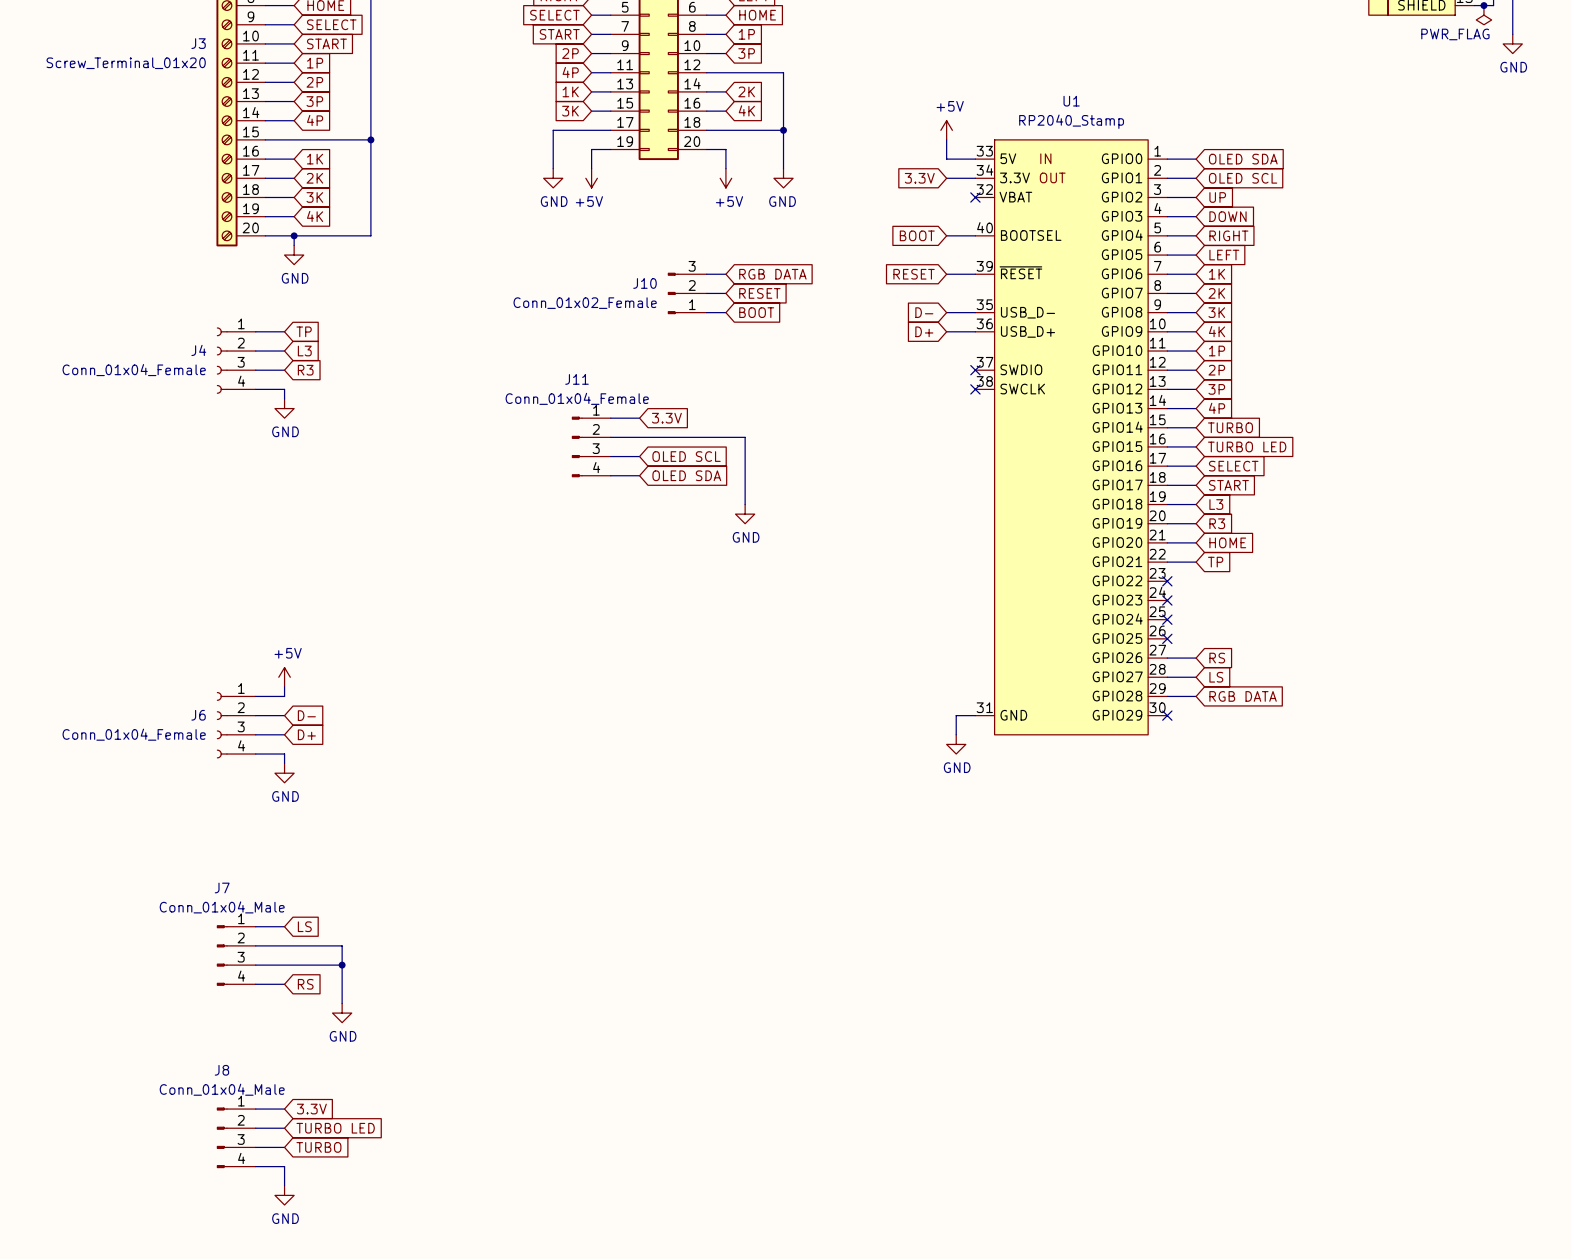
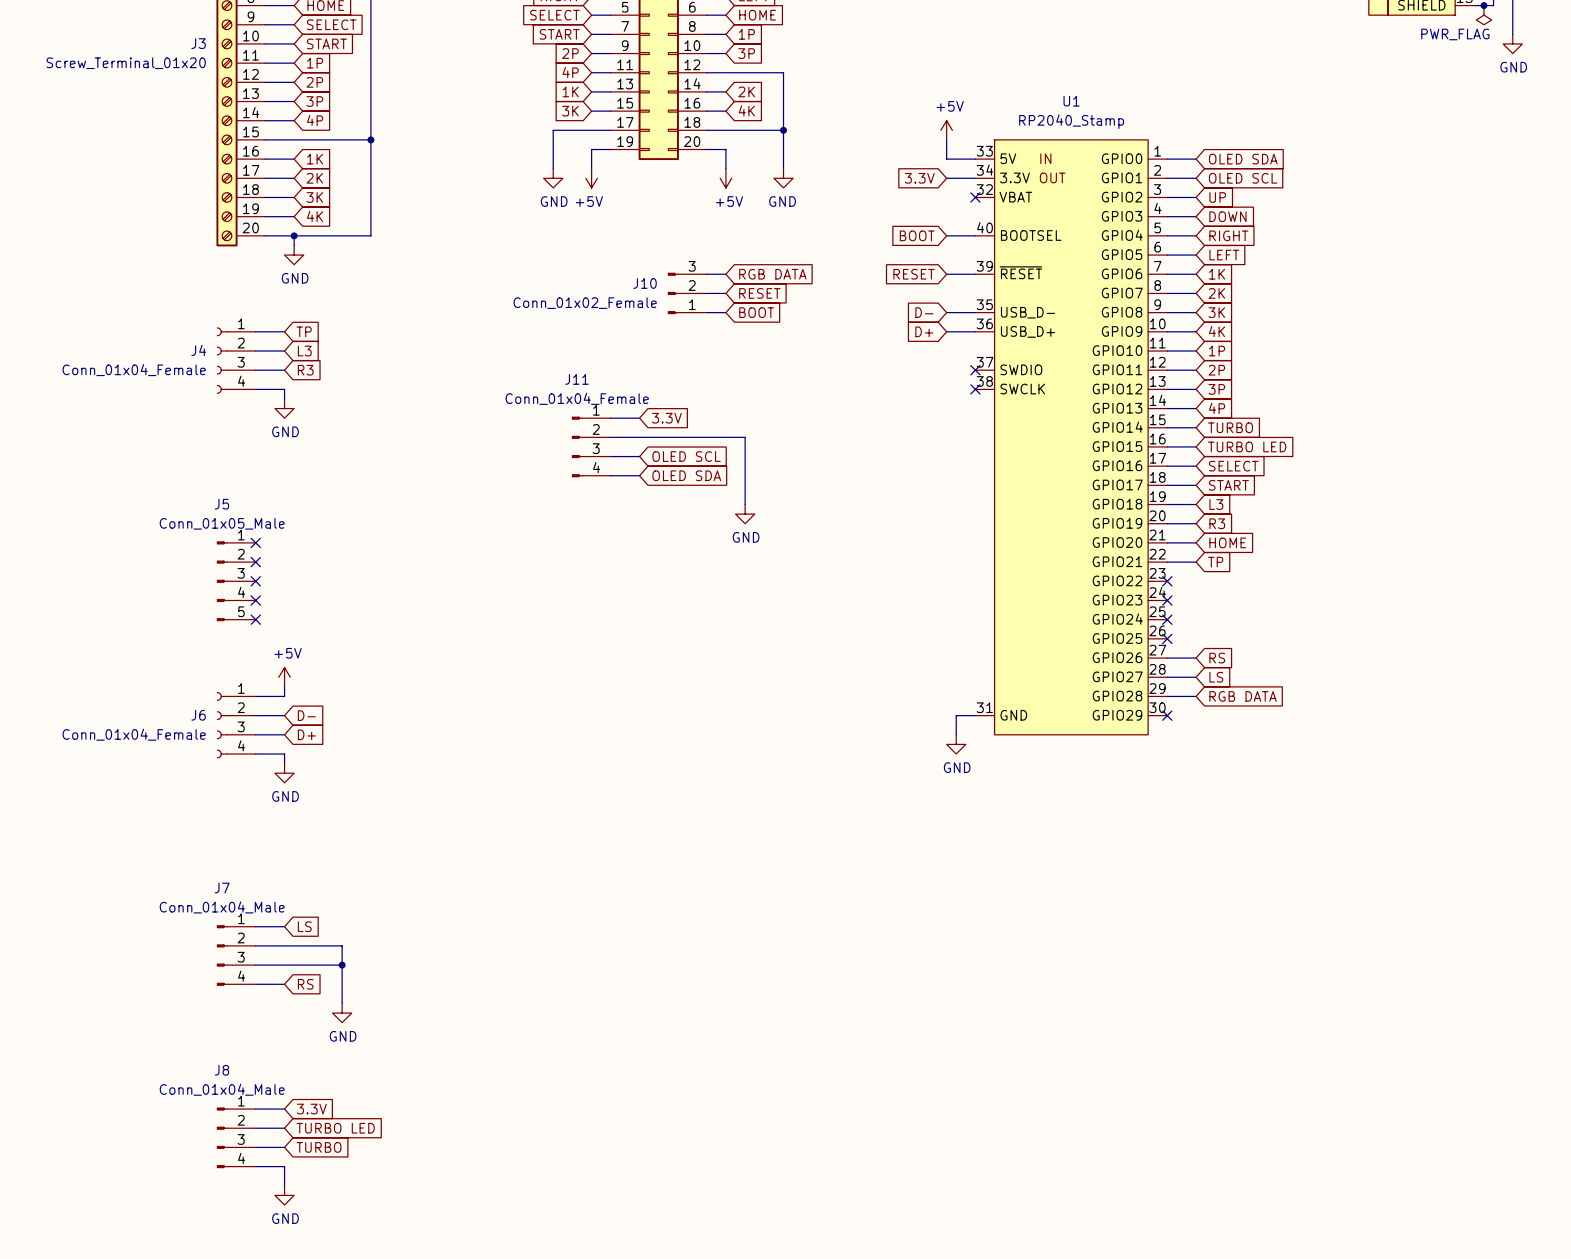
no-connect mark: none -> (255, 542)
no-connect mark: none -> (255, 562)
J5: none -> Conn_01x05_Male (236, 581)
no-connect mark: none -> (255, 581)
no-connect mark: none -> (255, 600)
no-connect mark: none -> (255, 619)

